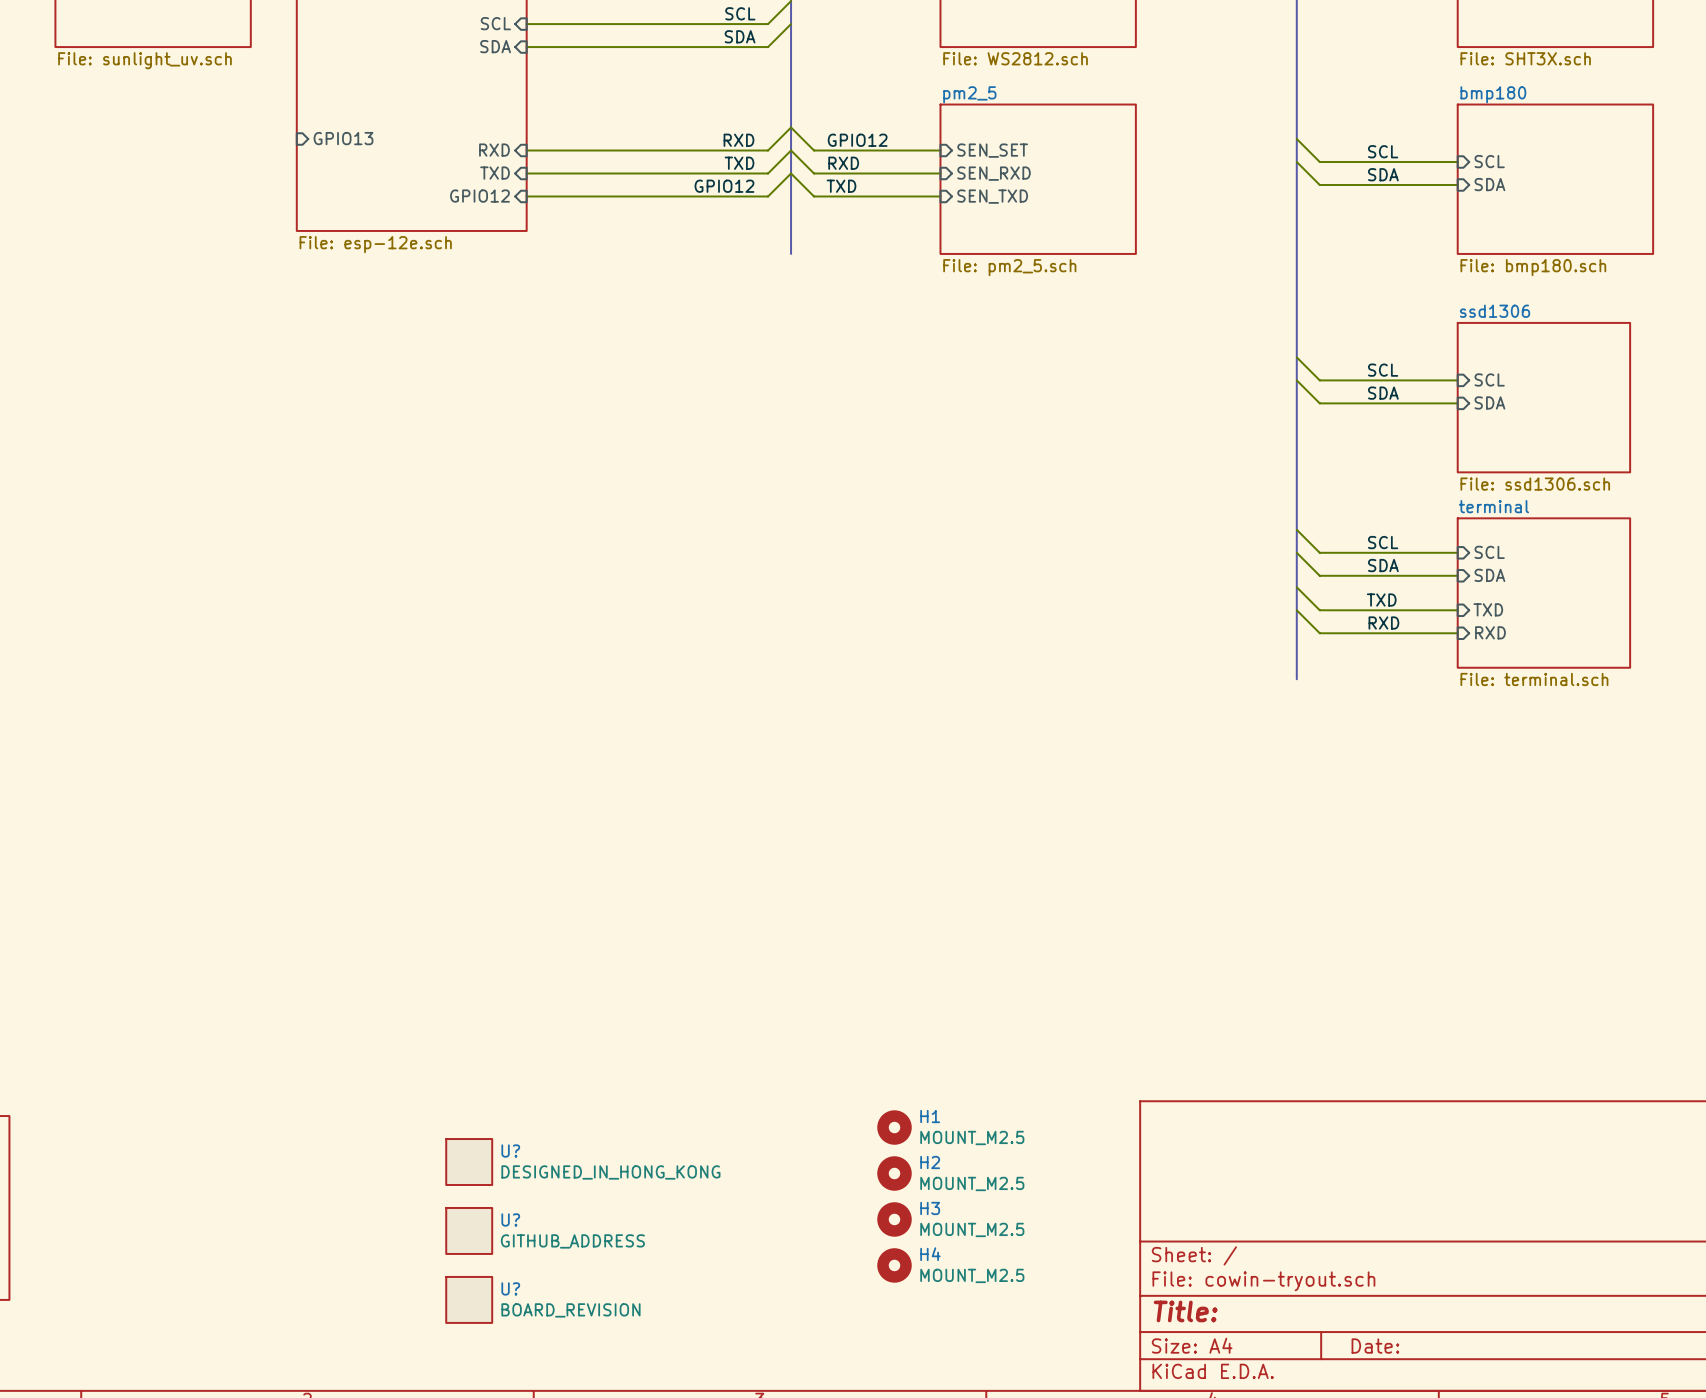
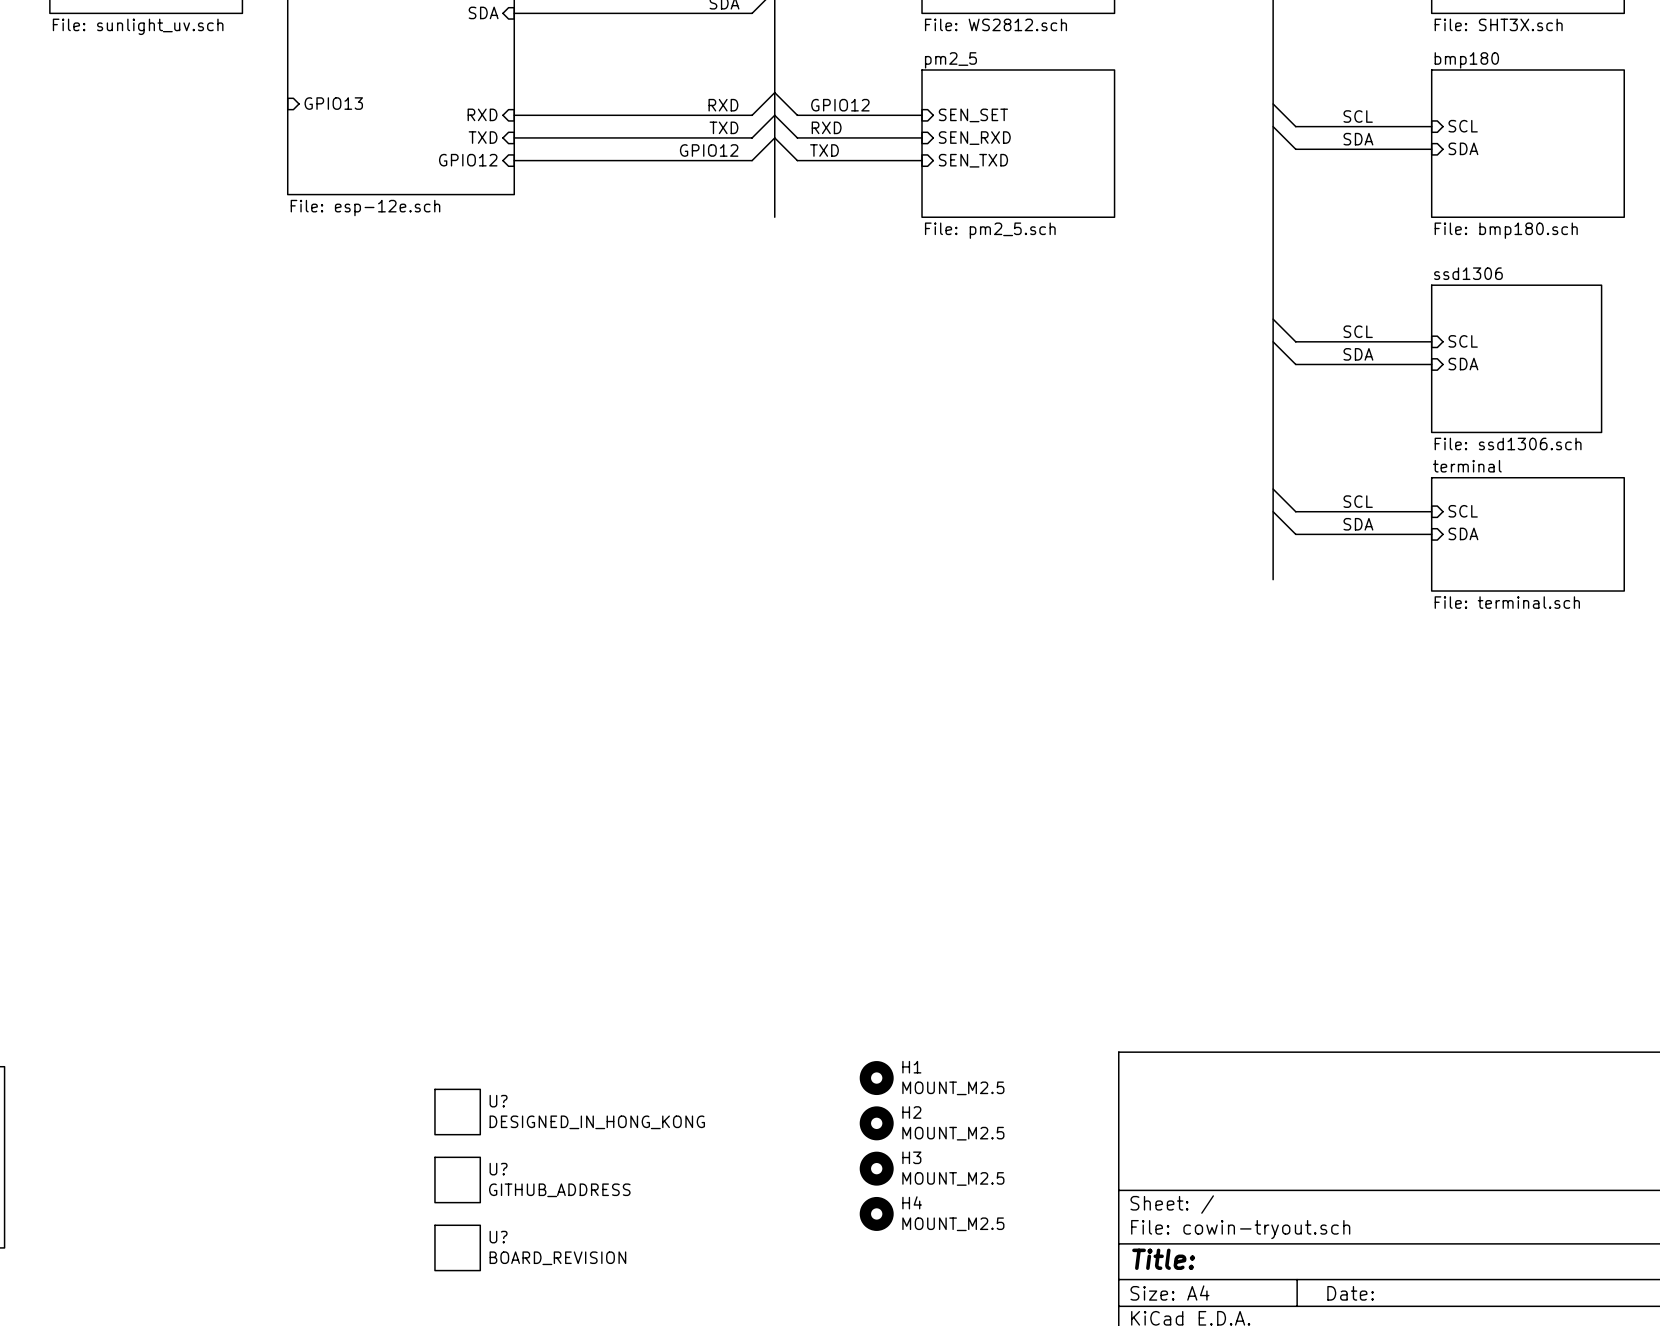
sheet terminal: none -> File: terminal.sch (1527, 534)
wire: (1296, 587) (1319, 610) (1457, 610) -> none
sheet terminal: File: terminal.sch (1543, 593) -> none
label: TXD (1381, 600) -> none
sheet pin: TXD (1488, 609) -> none
wire: (1296, 610) (1319, 633) (1457, 633) -> none
bus: (1296, 621) (1296, 679) -> none
label: RXD (1383, 623) -> none
sheet pin: RXD (1490, 632) -> none

